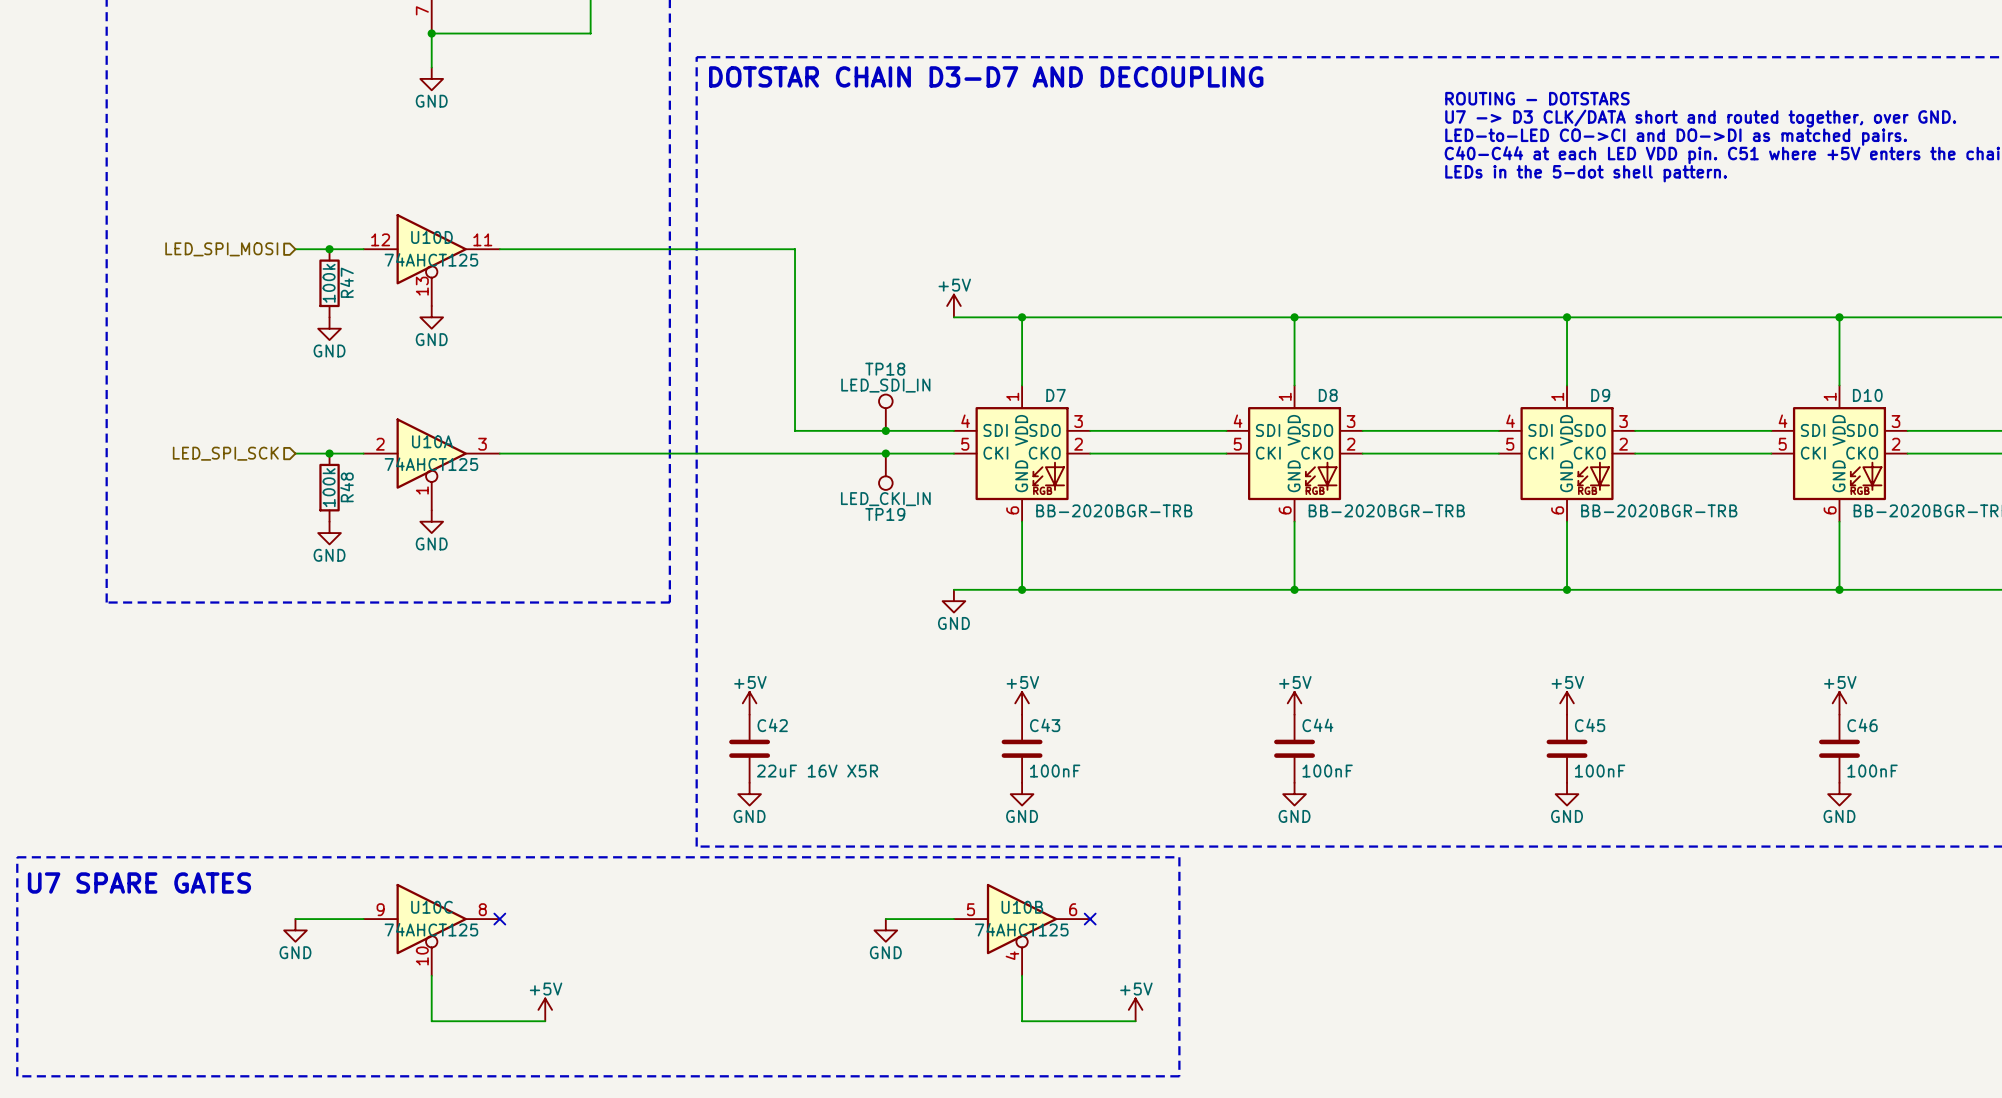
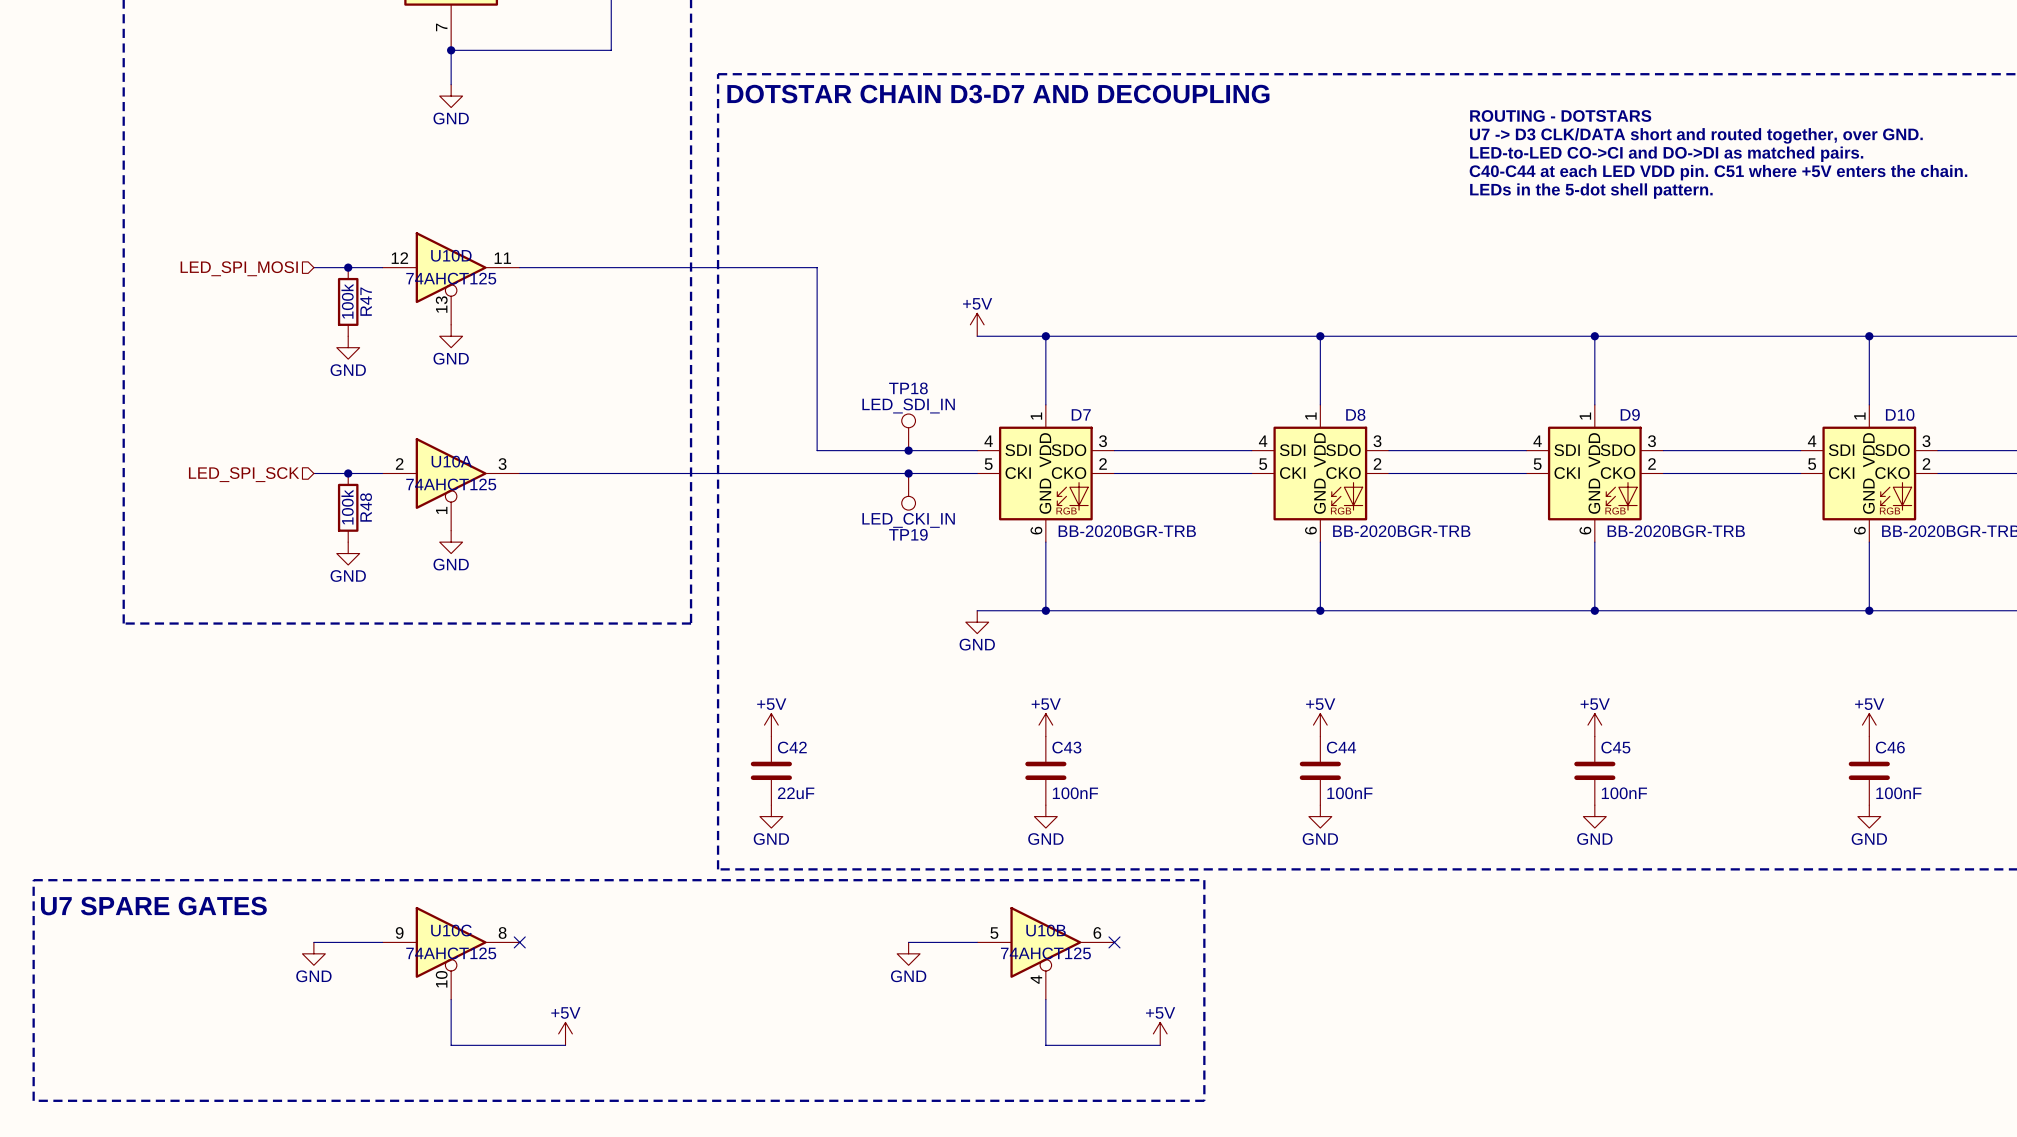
C42 value: 22uF 16V X5R (817, 771) -> 22uF (796, 793)

